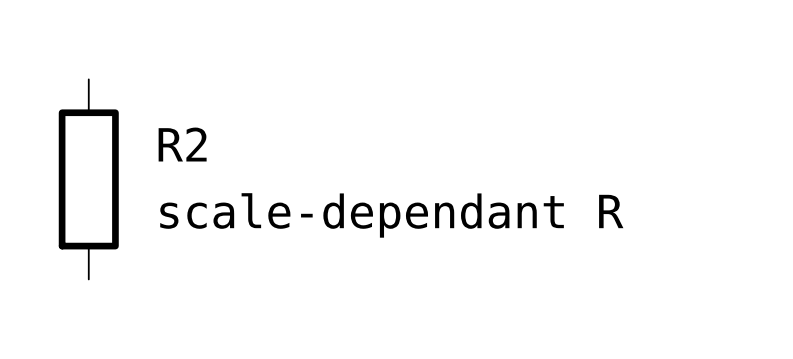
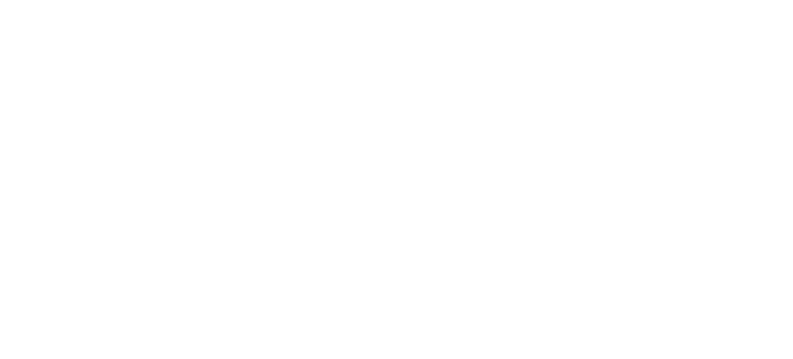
R2: scale-dependant R (88, 179) -> none

